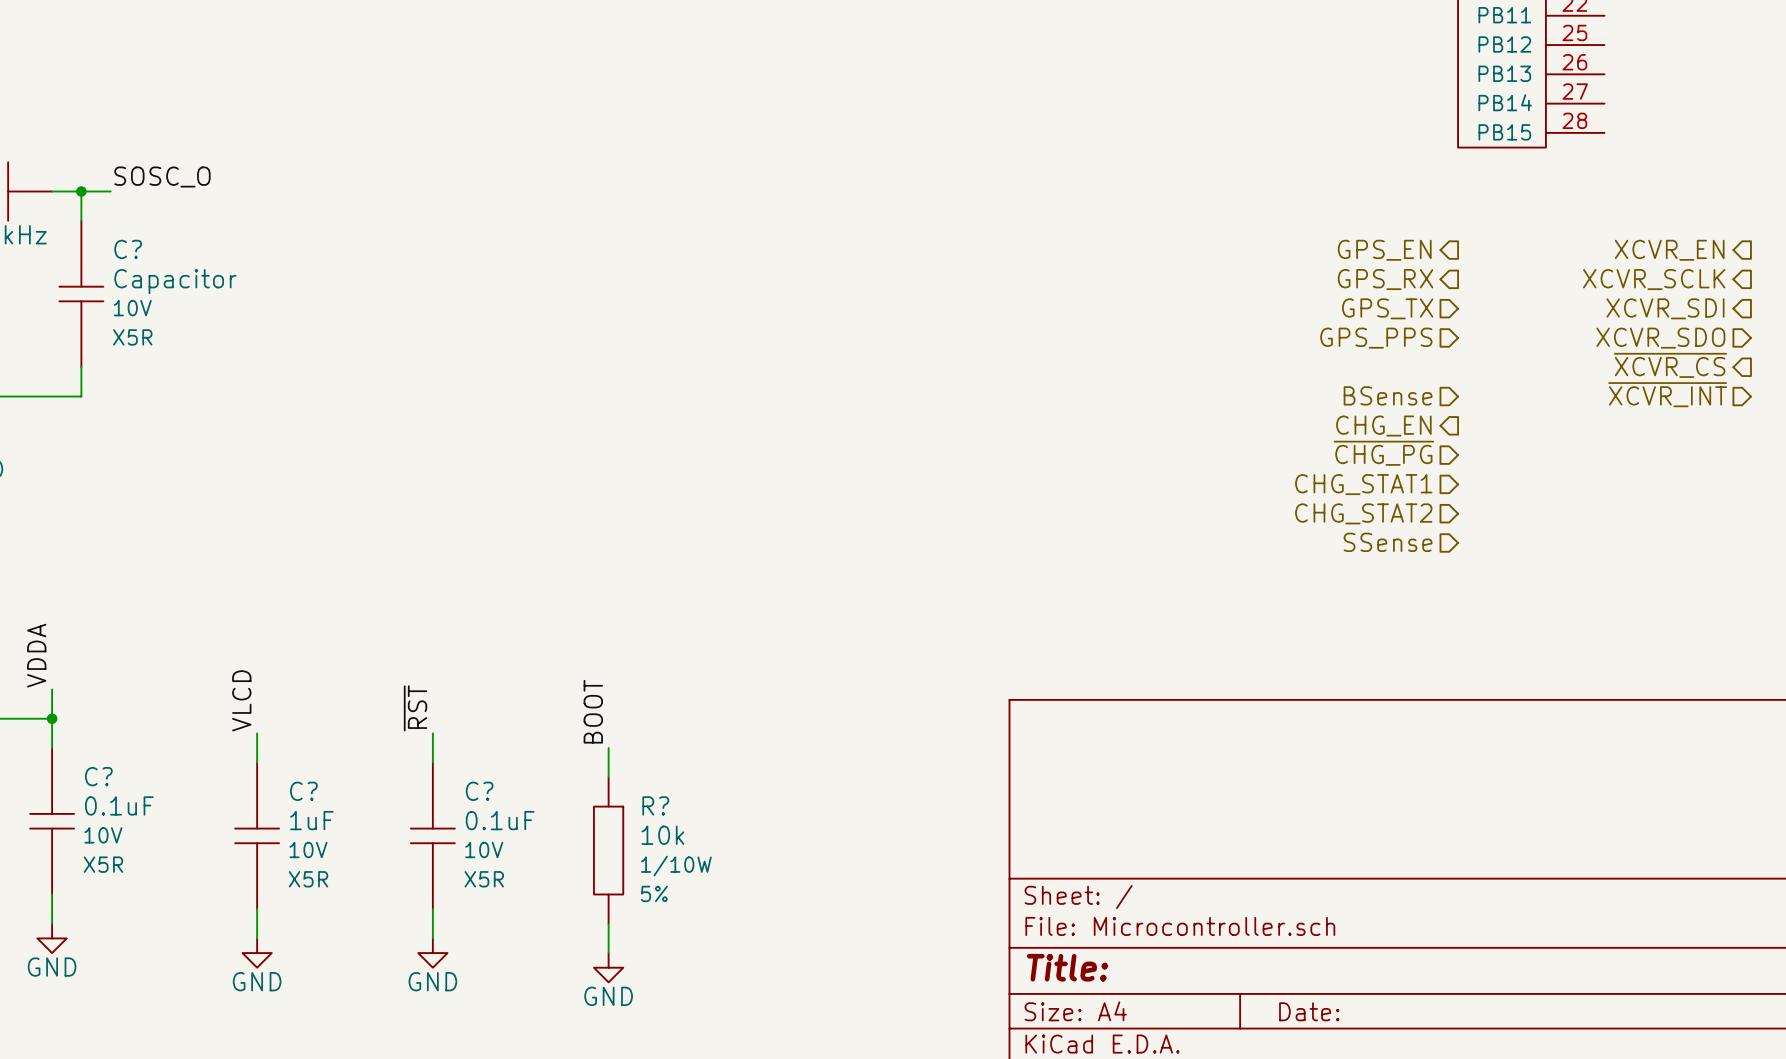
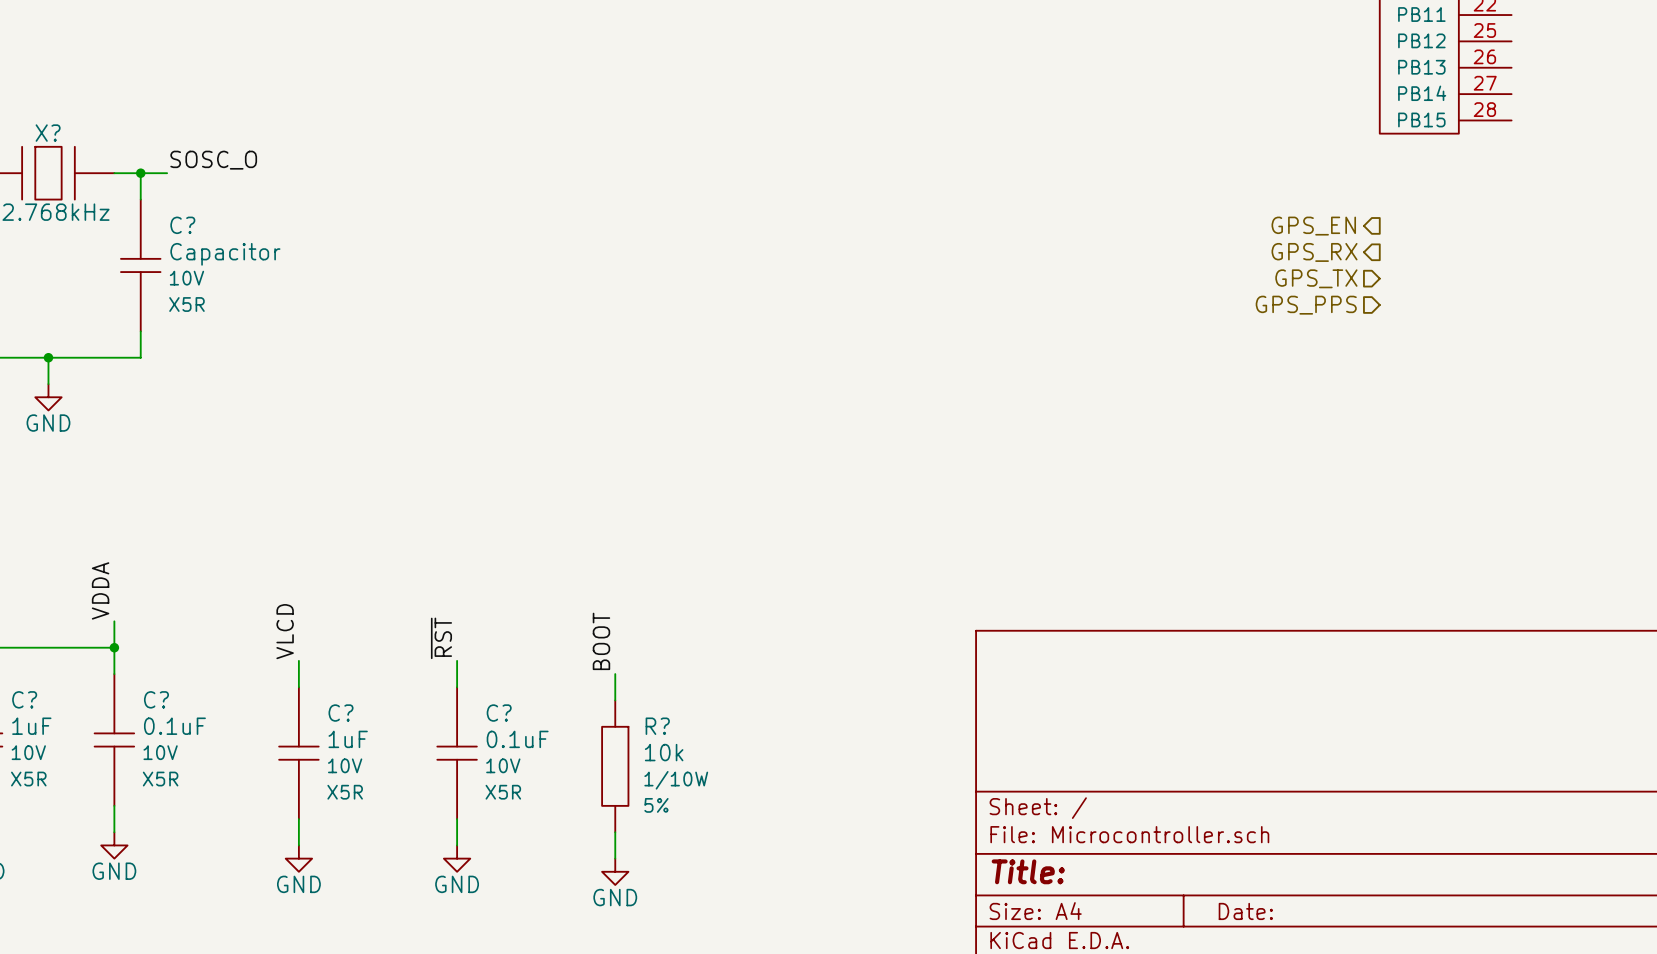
hierarchical label: XCVR_EN (1669, 250) -> none
hierarchical label: XCVR_SCLK (1654, 279) -> none
hierarchical label: XCVR_SDI (1665, 308) -> none
hierarchical label: XCVR_SDO (1660, 338) -> none
hierarchical label: ~{XCVR_CS} (1670, 365) -> none
hierarchical label: ~{XCVR_INT} (1667, 394) -> none
hierarchical label: BSense (1388, 395) -> none
hierarchical label: CHG_EN (1383, 426) -> none
hierarchical label: ~{CHG_PG} (1383, 453) -> none
hierarchical label: CHG_STAT1 (1363, 484) -> none
hierarchical label: CHG_STAT2 (1363, 513) -> none
hierarchical label: SSense (1388, 542) -> none

